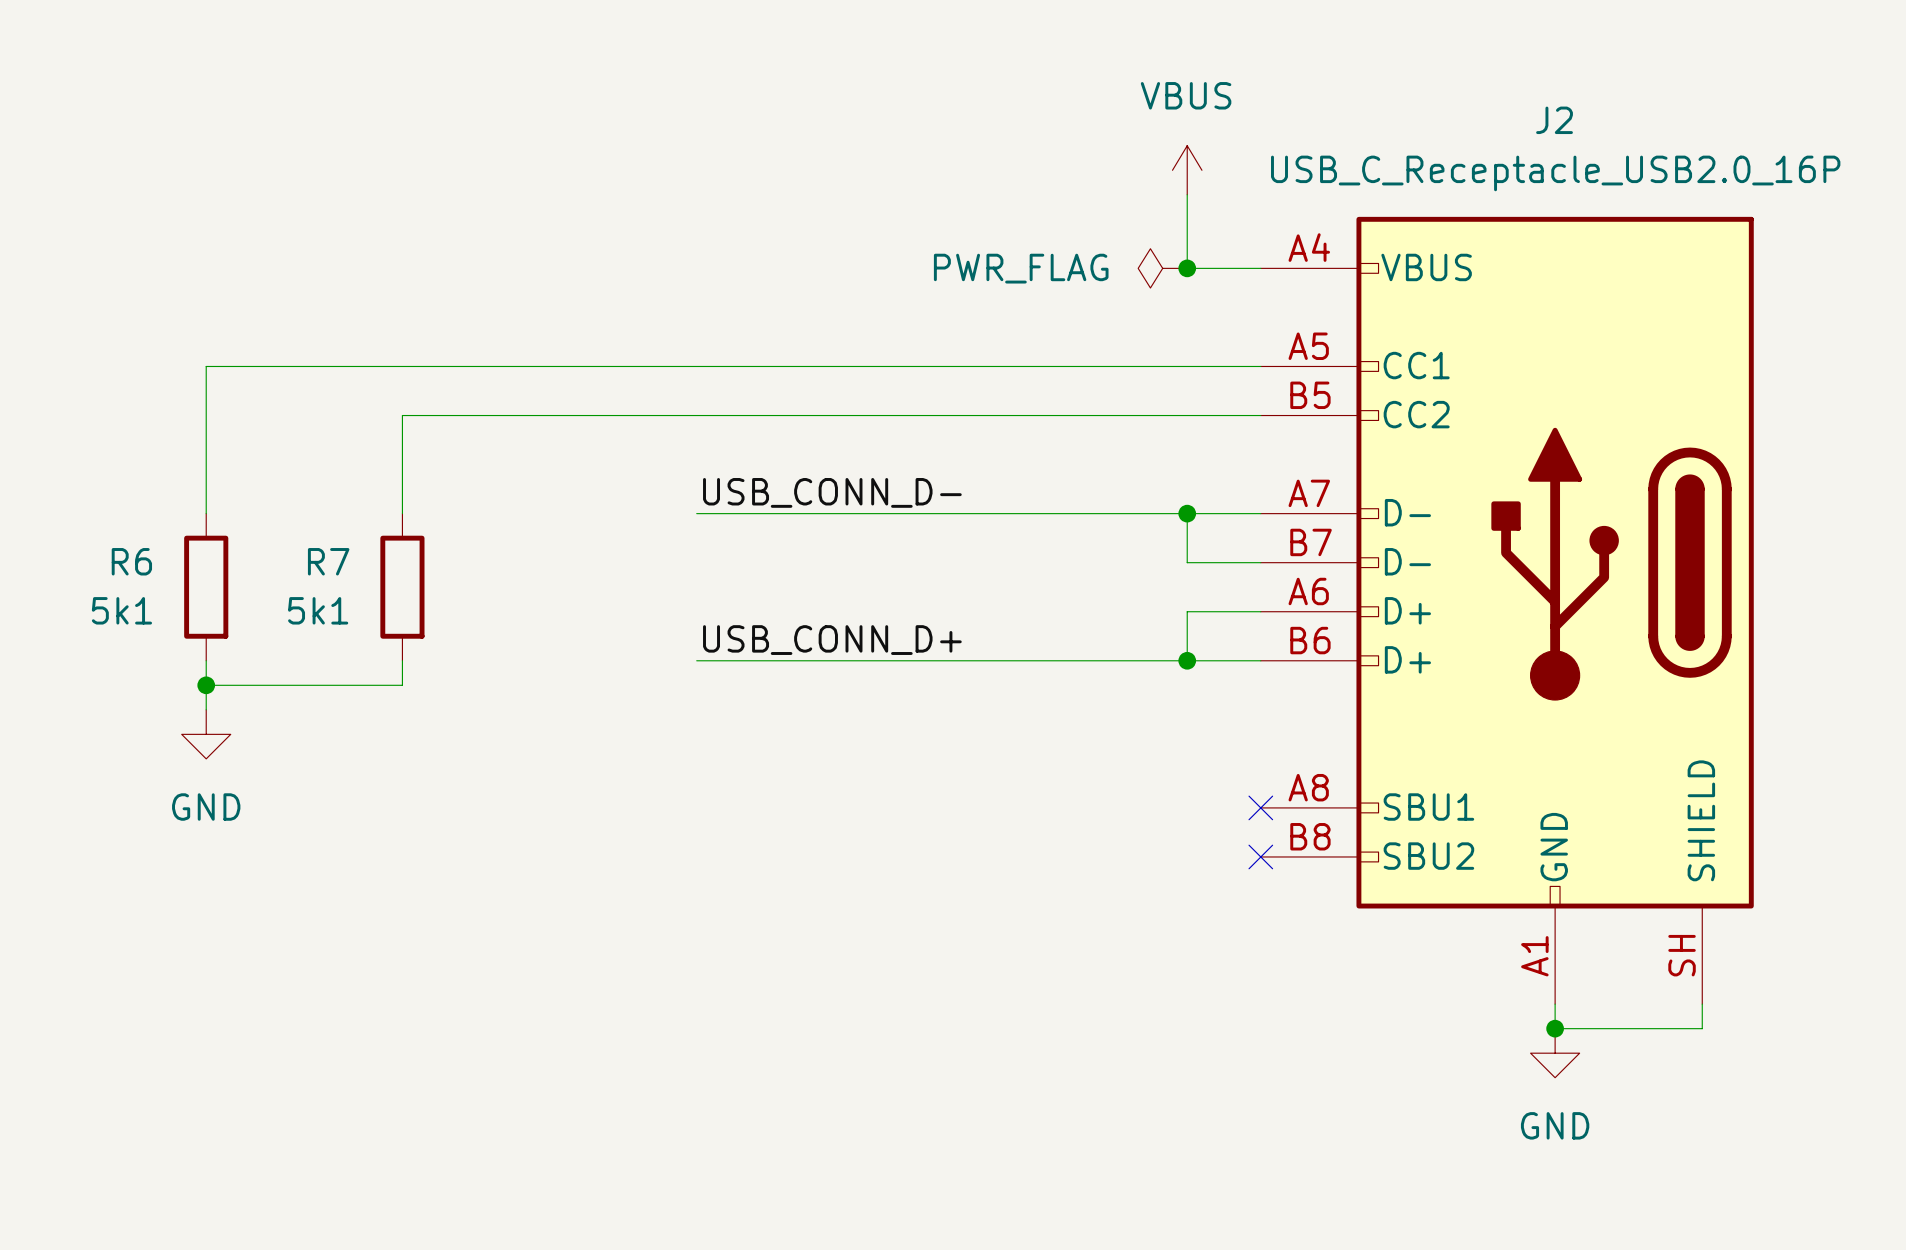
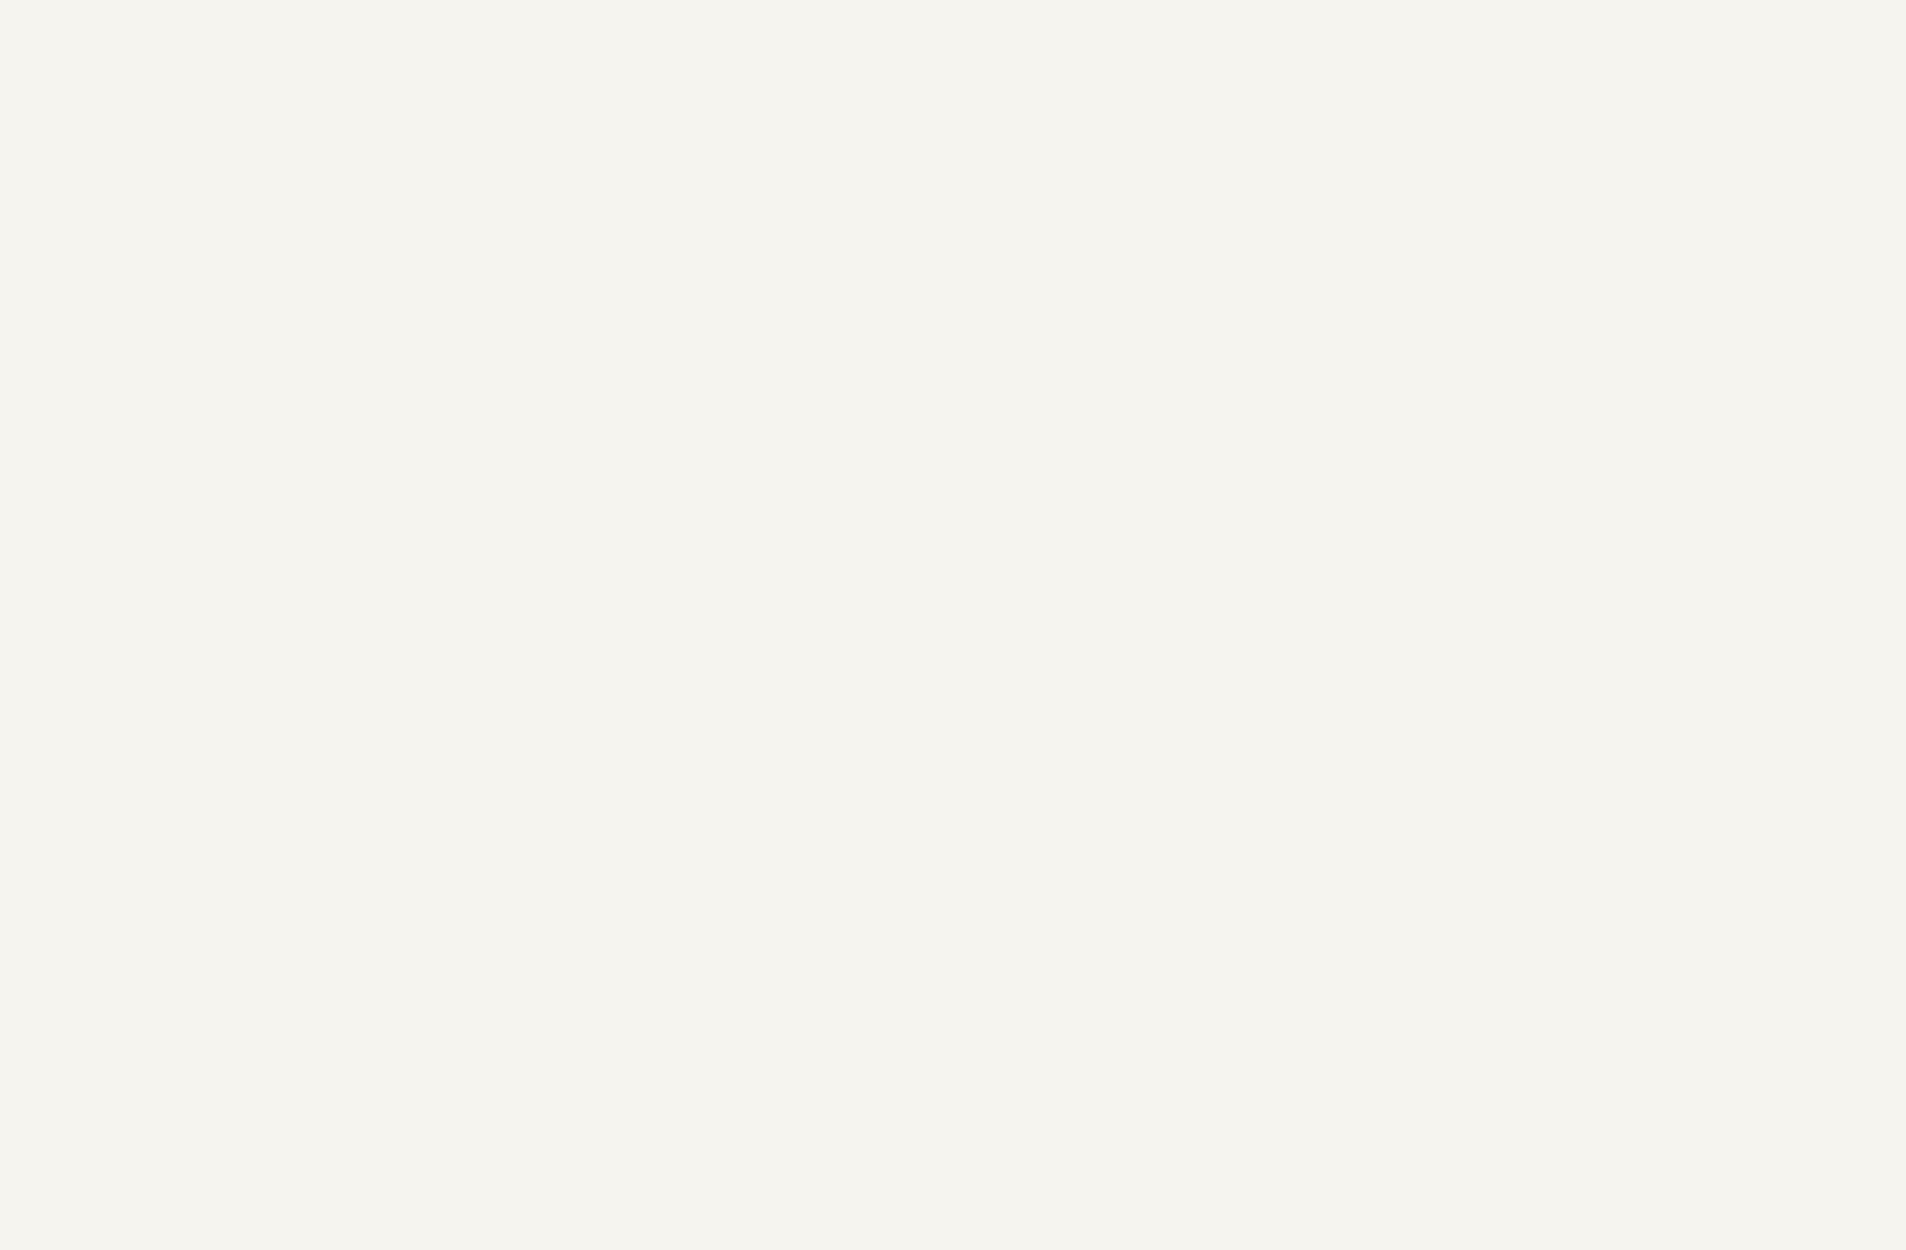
power symbol: VBUS (1187, 170) -> none
wire: (1187, 194) (1187, 268) (1260, 268) -> none
power symbol: PWR_FLAG (1162, 268) -> none
junction: (1187, 268) -> none
wire: (1260, 366) (206, 366) (206, 513) -> none
wire: (1260, 415) (402, 415) (402, 513) -> none
label: USB_CONN_D- (832, 492) -> none
wire: (696, 513) (1260, 513) -> none
wire: (1187, 513) (1187, 562) (1260, 562) -> none
junction: (1187, 513) -> none
R6: 5k1 (206, 587) -> none
R7: 5k1 (402, 587) -> none
J2: USB_C_Receptacle_USB2.0_16P (1507, 610) -> none
wire: (1260, 611) (1187, 611) (1187, 660) -> none
label: USB_CONN_D+ (832, 640) -> none
wire: (206, 660) (206, 709) -> none
wire: (402, 660) (402, 685) (206, 685) -> none
wire: (696, 660) (1260, 660) -> none
junction: (1187, 660) -> none
junction: (206, 685) -> none
power symbol: GND (206, 734) -> none
no-connect mark: (1260, 807) -> none
no-connect mark: (1260, 856) -> none
wire: (1555, 1004) (1555, 1028) (1702, 1028) (1702, 1004) -> none
junction: (1555, 1028) -> none
power symbol: GND (1555, 1053) -> none

